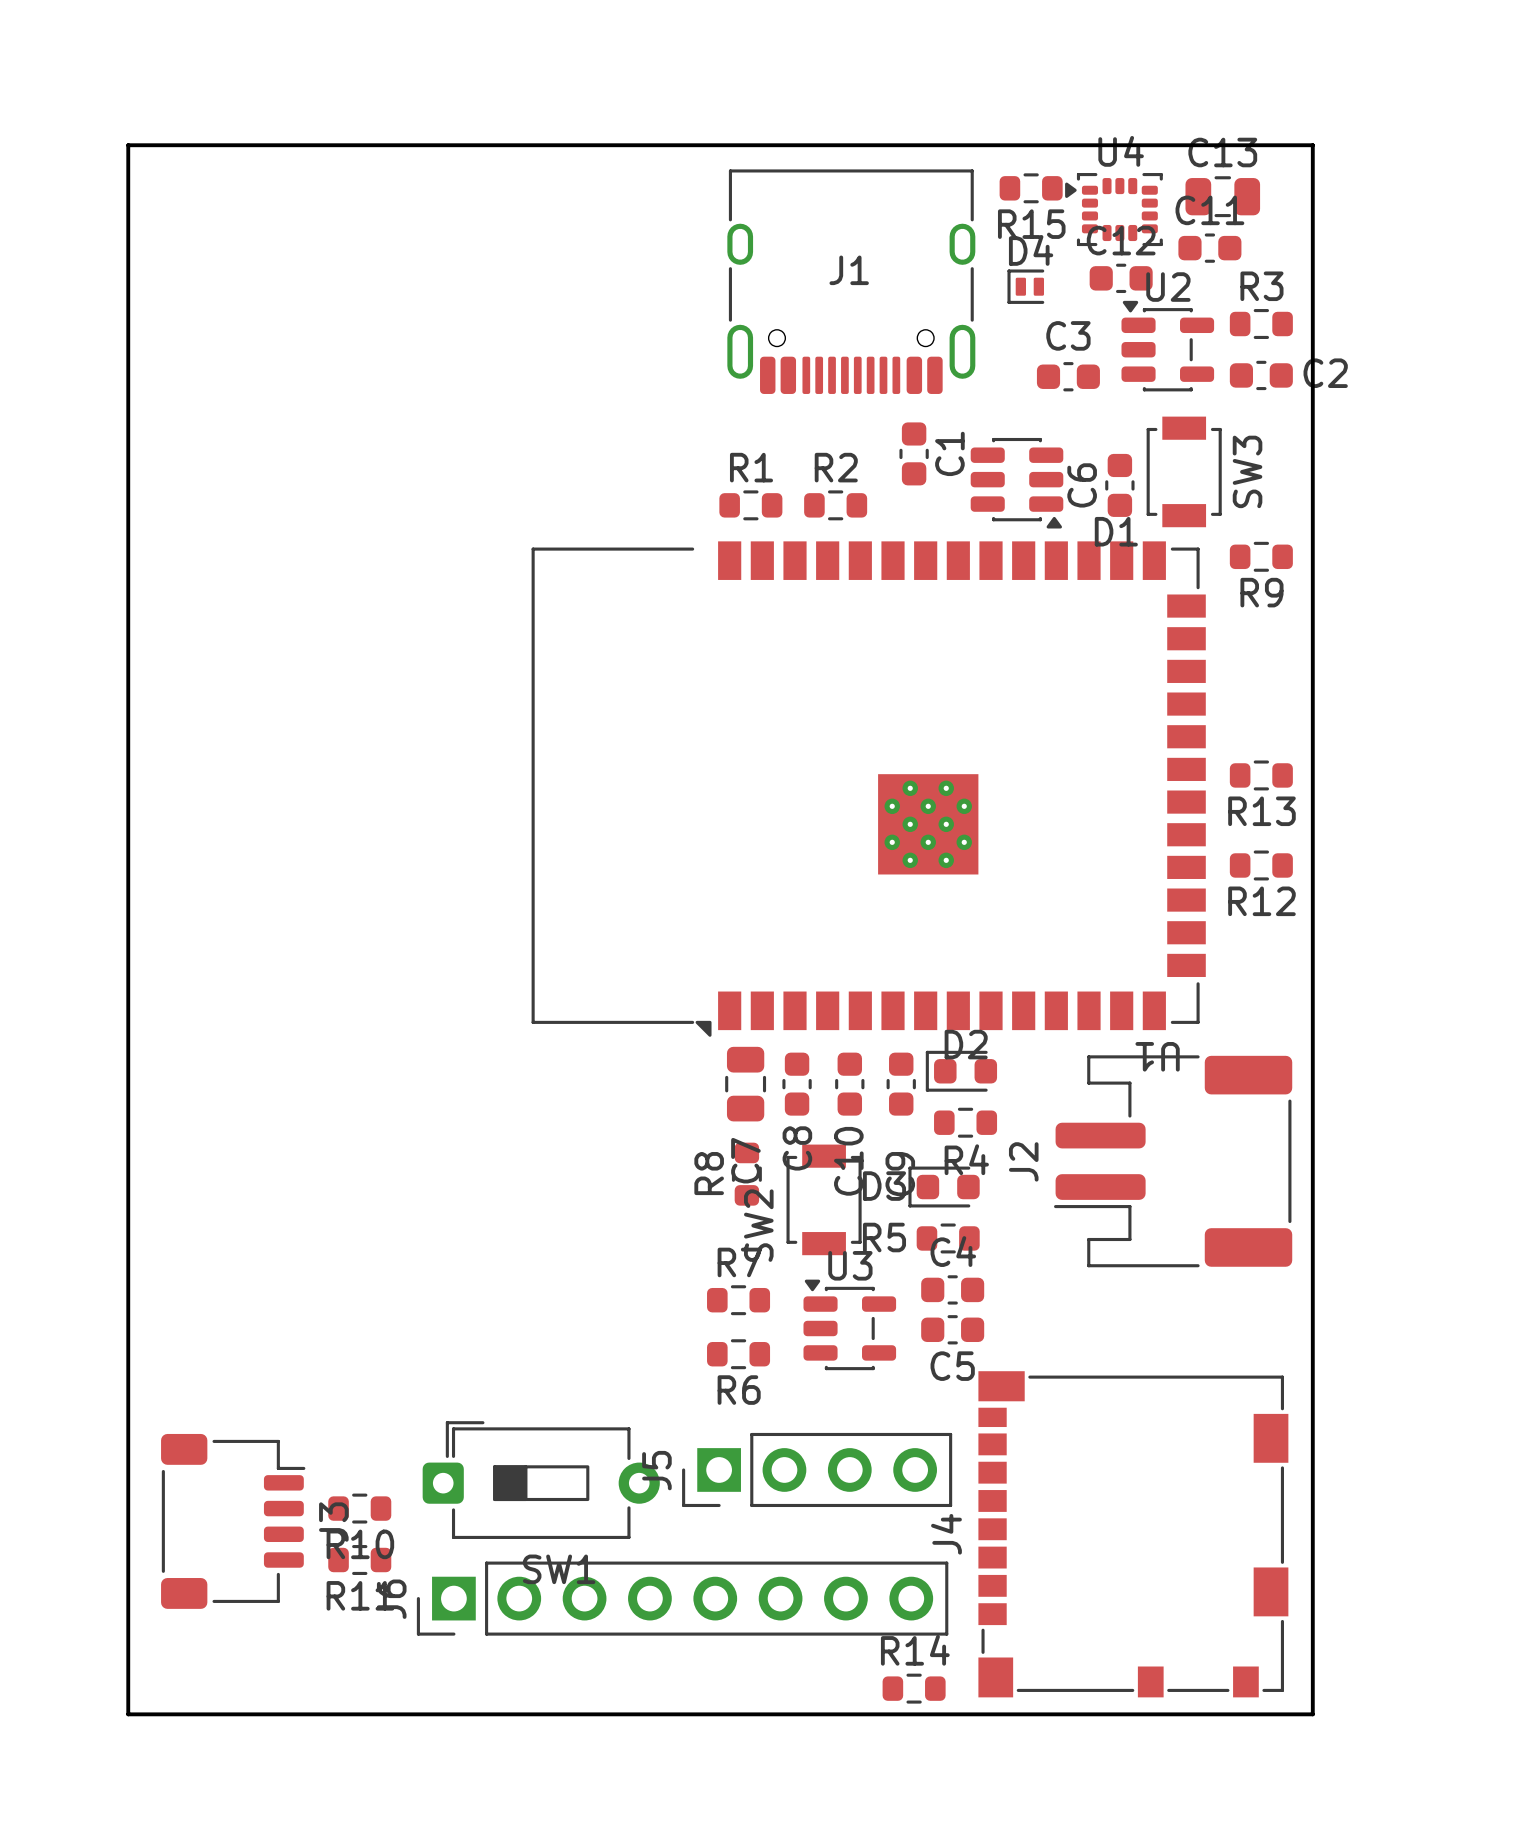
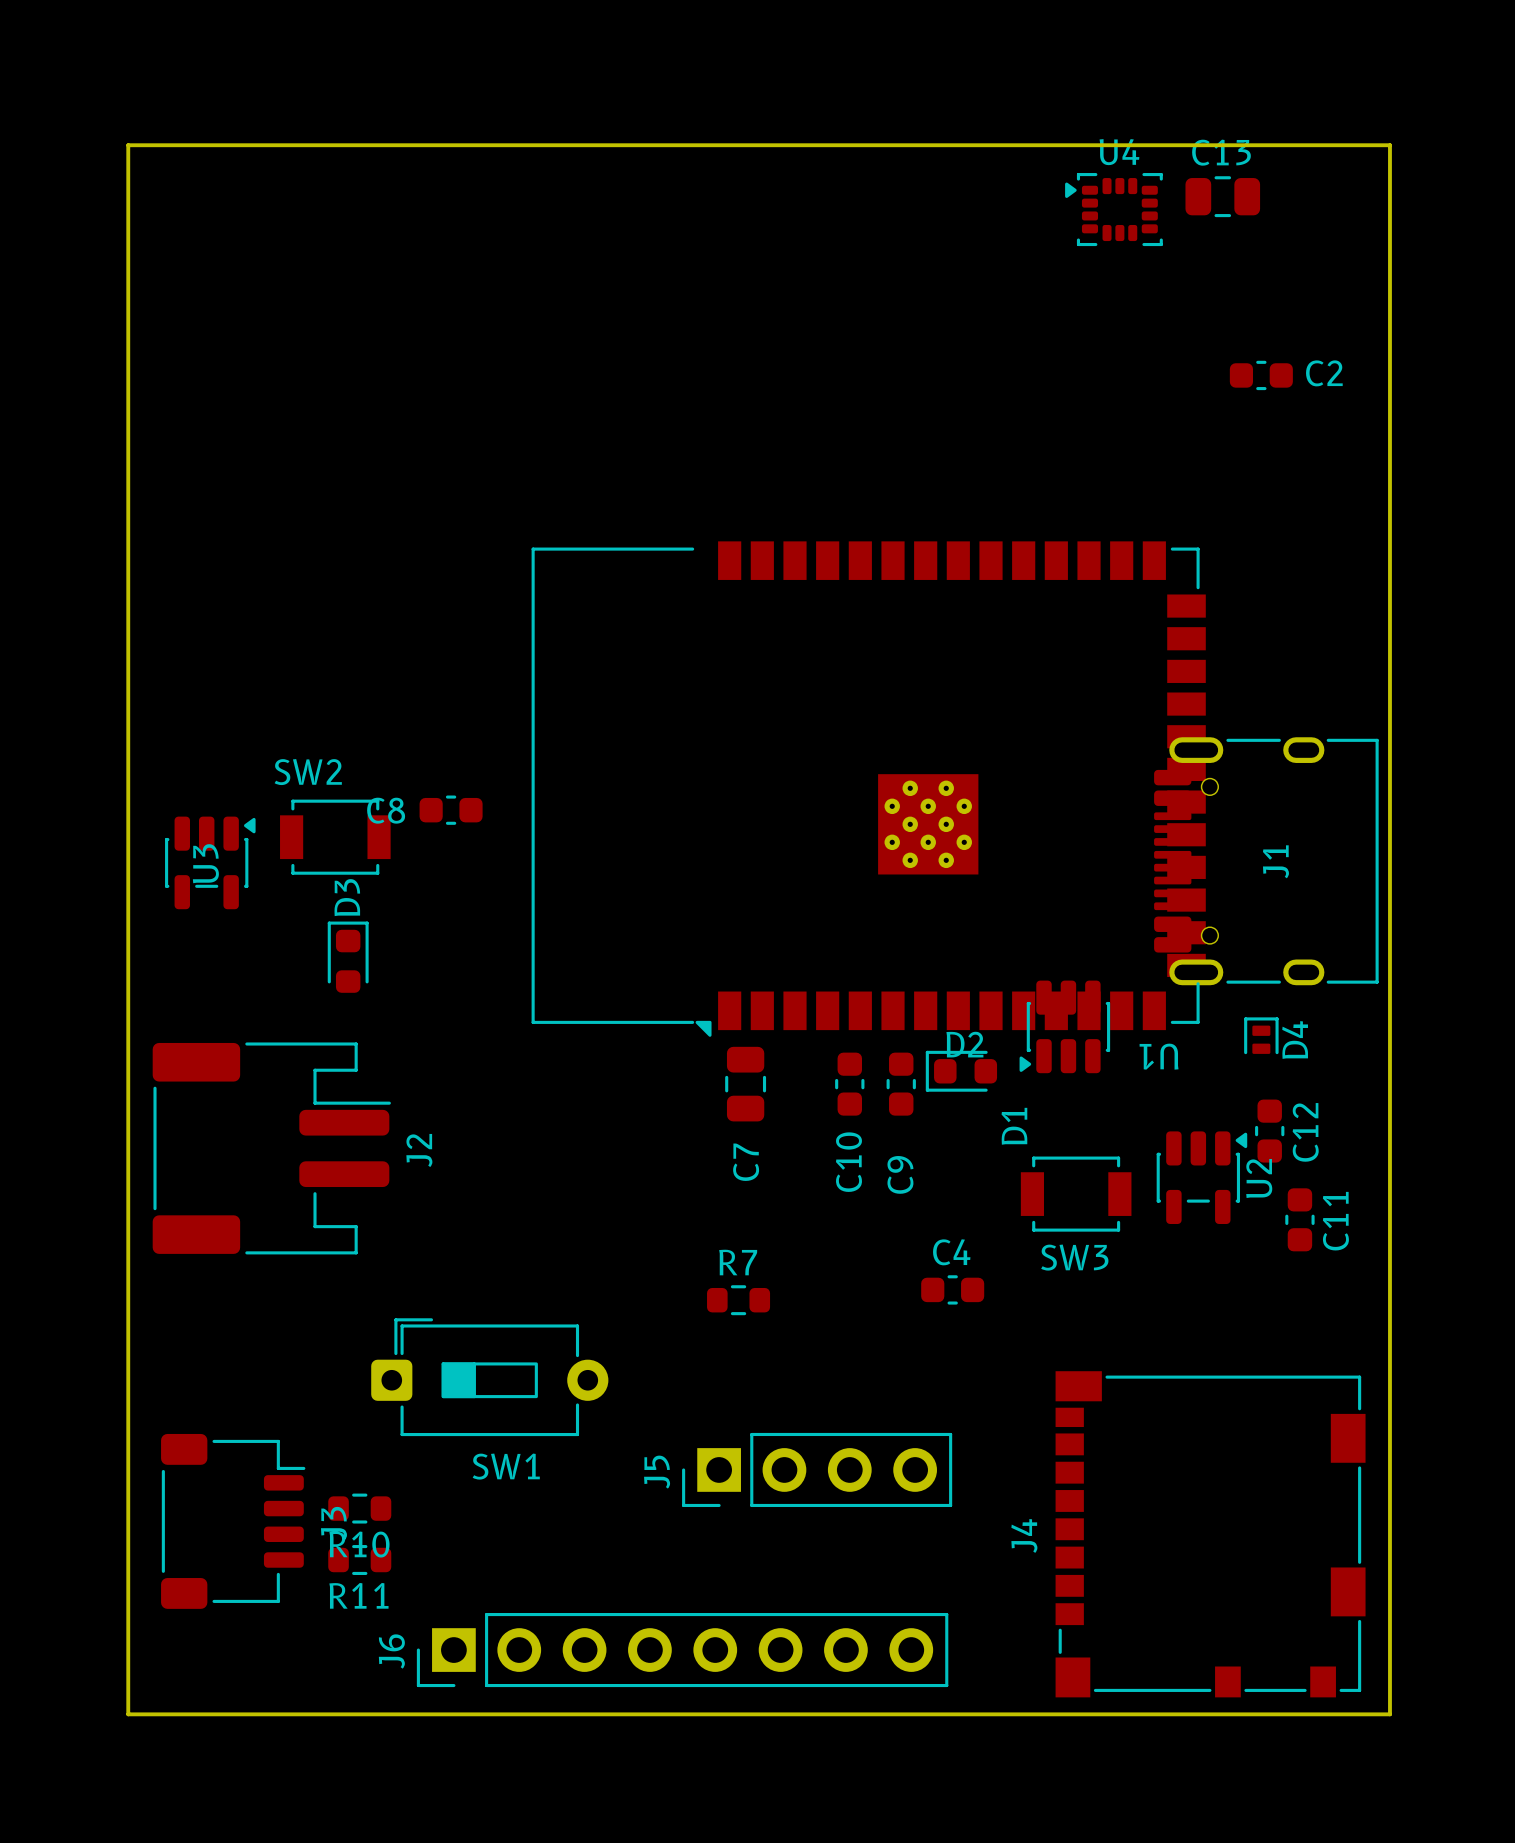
board edge: (1312, 145) (1312, 1714) -> (1312, 145) (1389, 145) (1389, 1714) (1312, 1714)
R15: (1031, 188) -> none
C11 rotation: 0° (1209, 248) -> 90° clockwise (1299, 1219)
C11 position: (1209, 248) -> (1299, 1219)
C12 rotation: 0° (1121, 278) -> 90° clockwise (1269, 1131)
C12 position: (1121, 278) -> (1269, 1131)
J1 rotation: 0° (851, 281) -> 90° clockwise (1266, 861)
J1 position: (851, 281) -> (1266, 861)
D4 rotation: 0° (1025, 286) -> 90° clockwise (1261, 1035)
D4 position: (1025, 286) -> (1261, 1035)
R3: (1261, 324) -> none
U2 rotation: 0° (1167, 346) -> 90° clockwise (1201, 1177)
U2 position: (1167, 346) -> (1201, 1177)
C3: (1068, 376) -> none
C1: (914, 453) -> none
SW3 rotation: 0° (1184, 471) -> 90° clockwise (1076, 1194)
SW3 position: (1184, 471) -> (1076, 1194)
D1 rotation: 0° (1016, 483) -> 90° clockwise (1064, 1026)
D1 position: (1016, 483) -> (1064, 1026)
C6: (1119, 485) -> none
R1: (750, 505) -> none
R2: (835, 505) -> none
R9: (1261, 556) -> none
R13: (1261, 775) -> none
R12: (1261, 865) -> none
C8 rotation: 0° (797, 1084) -> 90° clockwise (451, 810)
C8 position: (797, 1084) -> (451, 810)
R4: (965, 1122) -> none
J2 rotation: 0° (1173, 1161) -> 180° (271, 1148)
J2 position: (1173, 1161) -> (271, 1148)
R8: (746, 1174) -> none
D3 rotation: 0° (944, 1187) -> 90° clockwise (348, 957)
D3 position: (944, 1187) -> (348, 957)
SW2 rotation: 0° (824, 1199) -> 90° clockwise (335, 837)
SW2 position: (824, 1199) -> (335, 837)
R5: (948, 1238) -> none
U3 name position: U3 (850, 1265) -> U3 (205, 863)
U3 rotation: 0° (849, 1324) -> 90° clockwise (210, 862)
U3 position: (849, 1324) -> (210, 862)
C5: (952, 1329) -> none
R6: (738, 1354) -> none
SW1 position: (541, 1480) -> (489, 1377)
J4 position: (1133, 1534) -> (1210, 1534)
J6 position: (682, 1598) -> (682, 1650)
R14: (914, 1688) -> none

